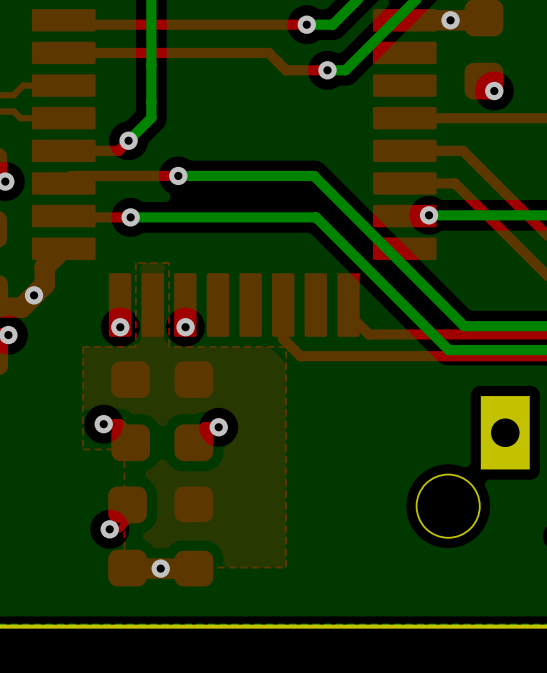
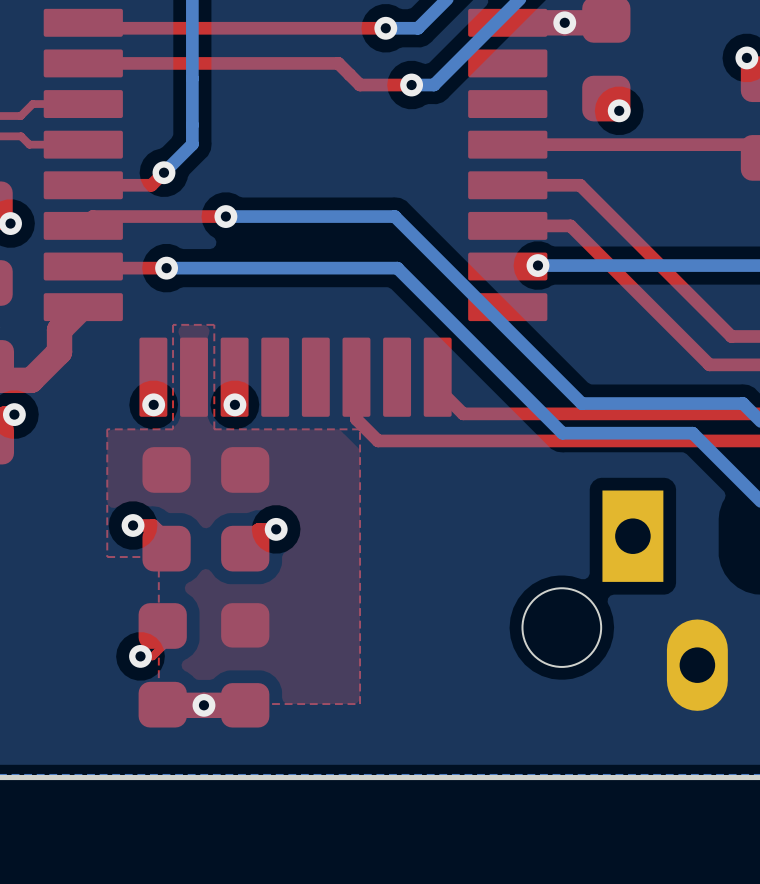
via: (34, 295) -> none

